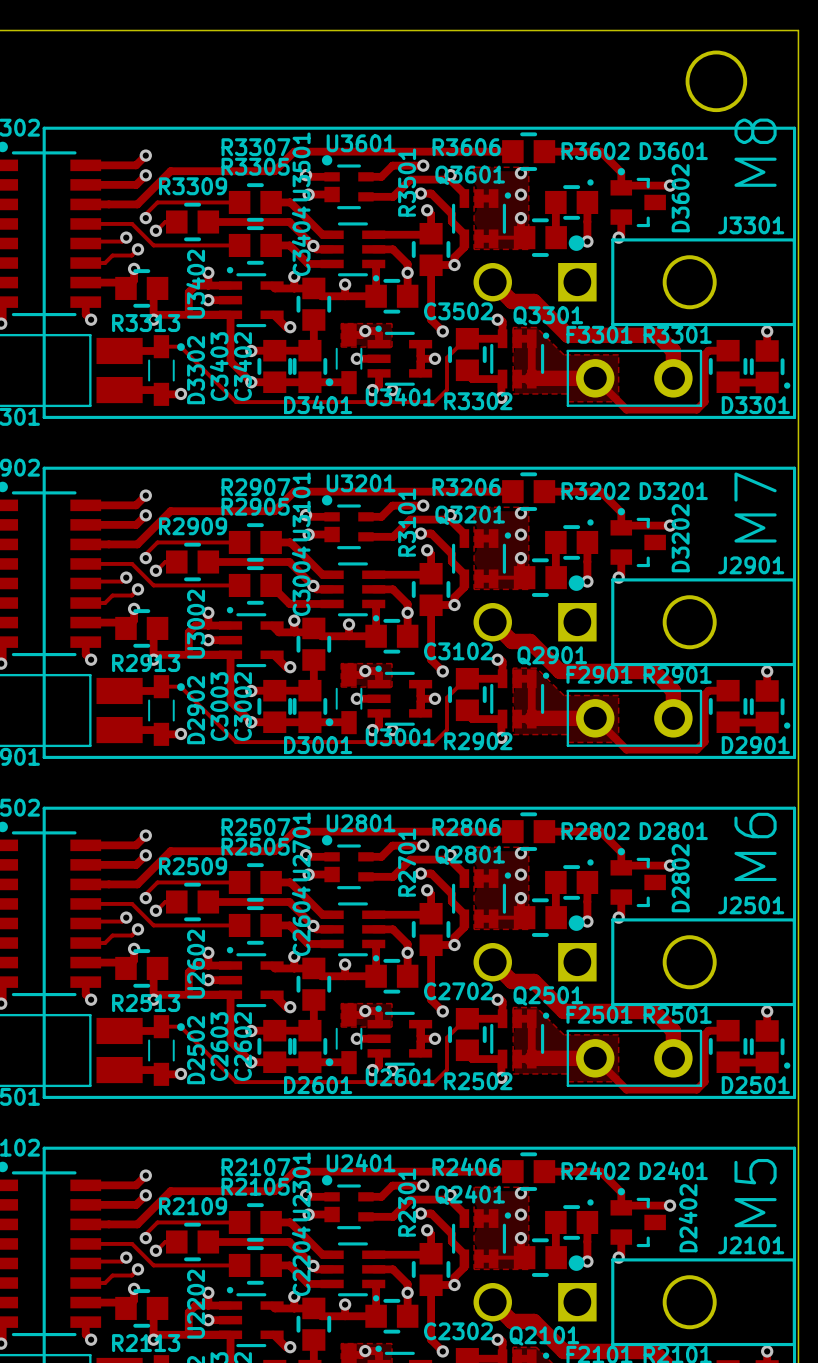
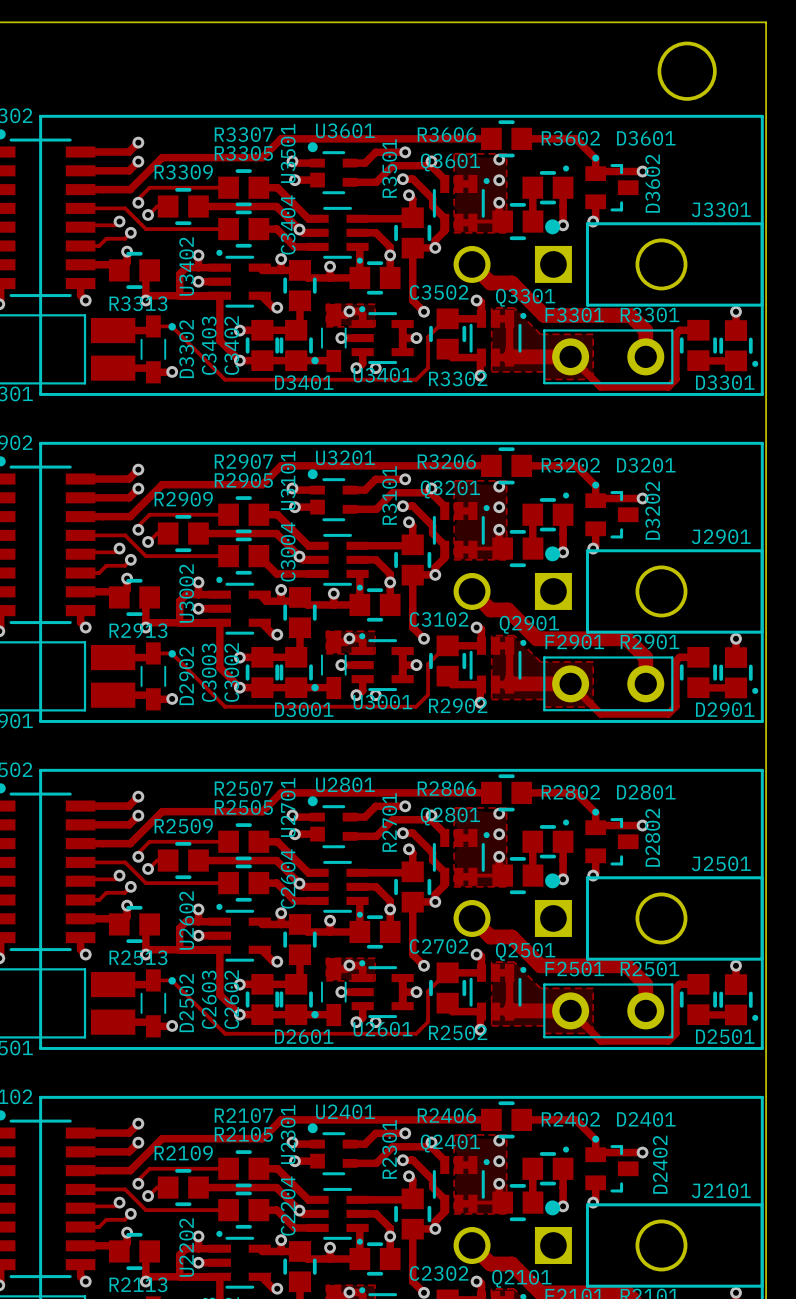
text: M8 (755, 152) -> none
text: M7 (755, 507) -> none
text: M6 (755, 846) -> none
text: M5 (755, 1193) -> none

